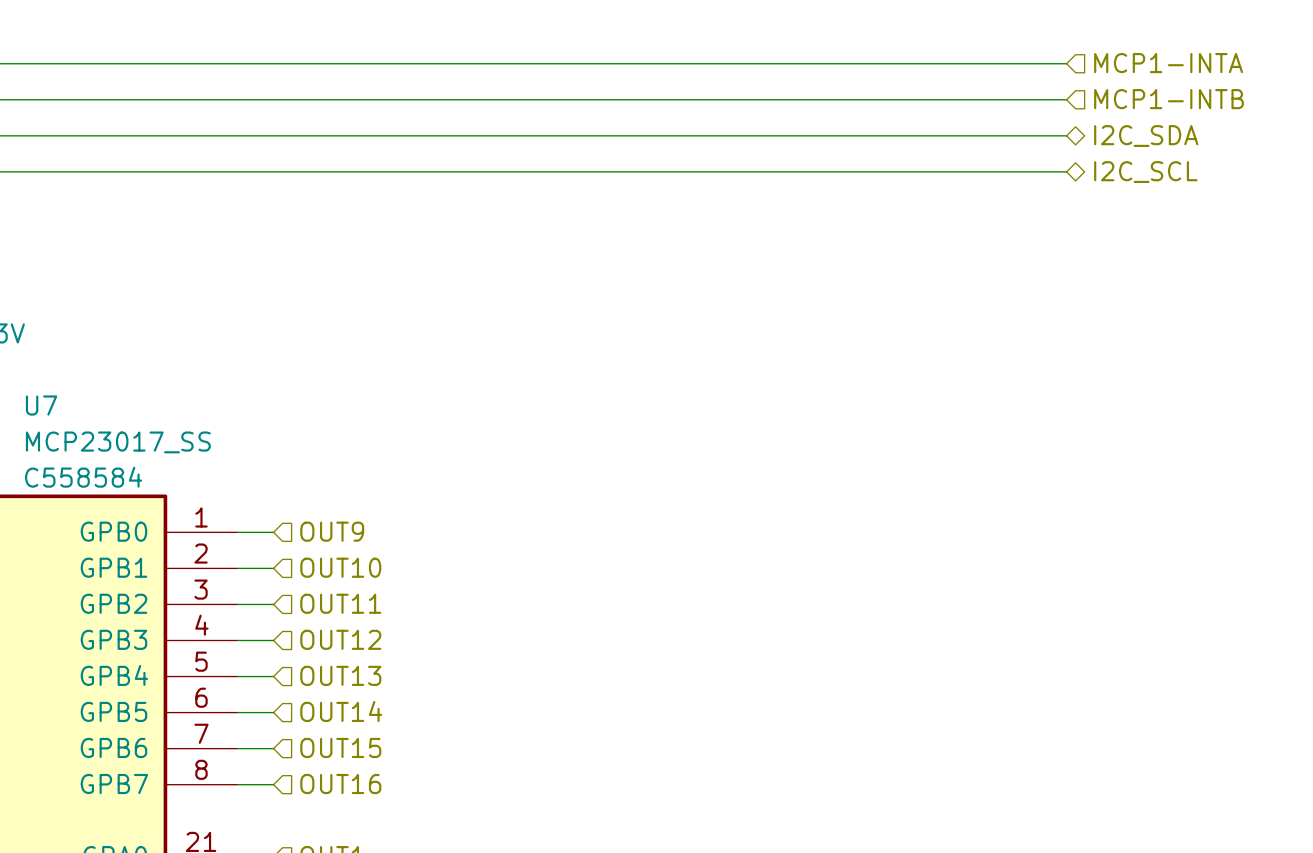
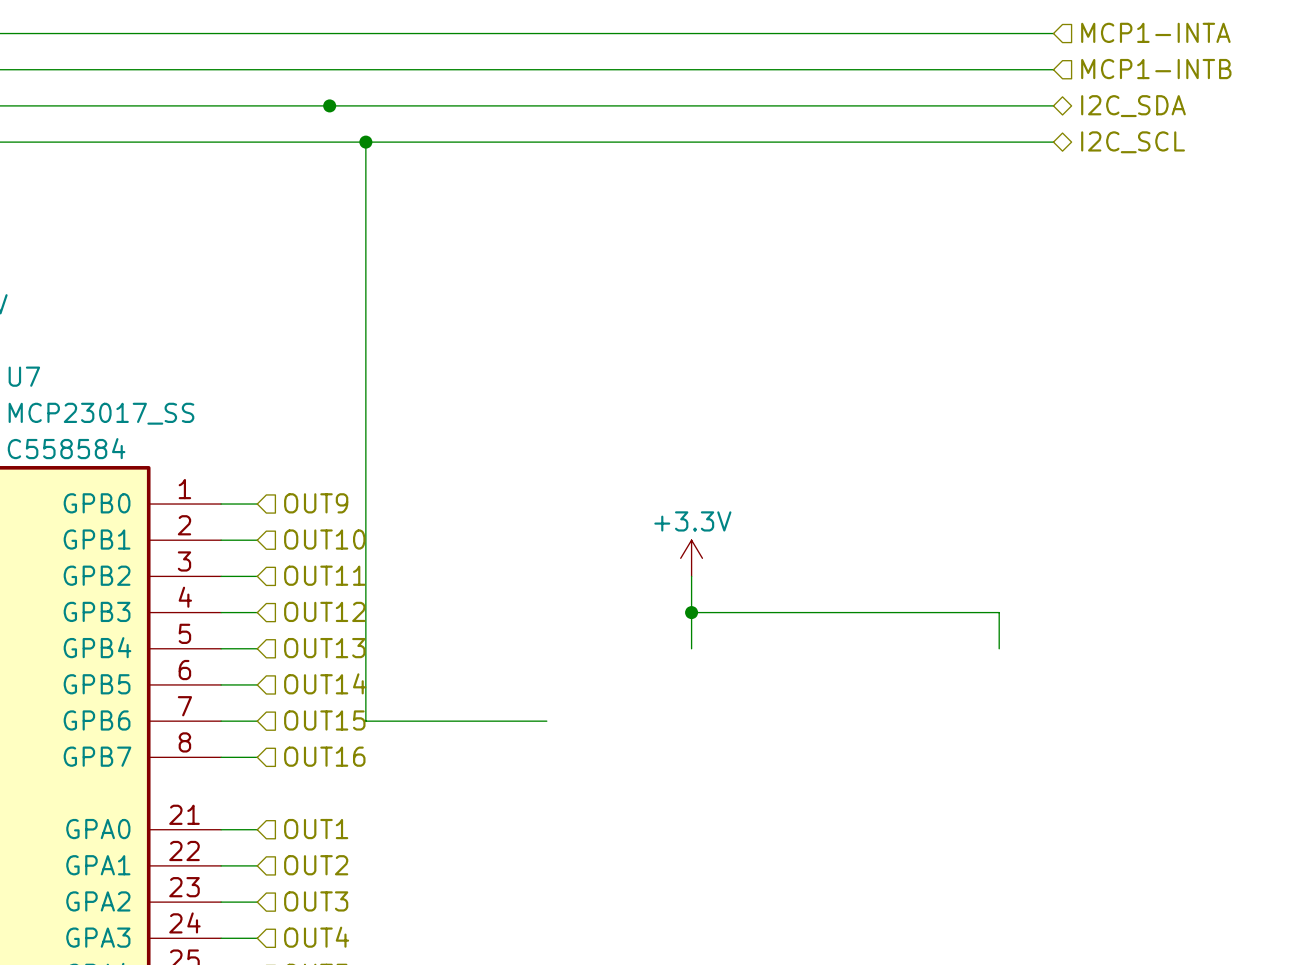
junction: none -> (329, 105)
wire: none -> (365, 142) (365, 721) (546, 721)
junction: none -> (365, 142)
power symbol: none -> +3.3V (691, 558)
wire: none -> (691, 576) (691, 648)
wire: none -> (691, 612) (999, 612) (999, 648)
junction: none -> (691, 612)

